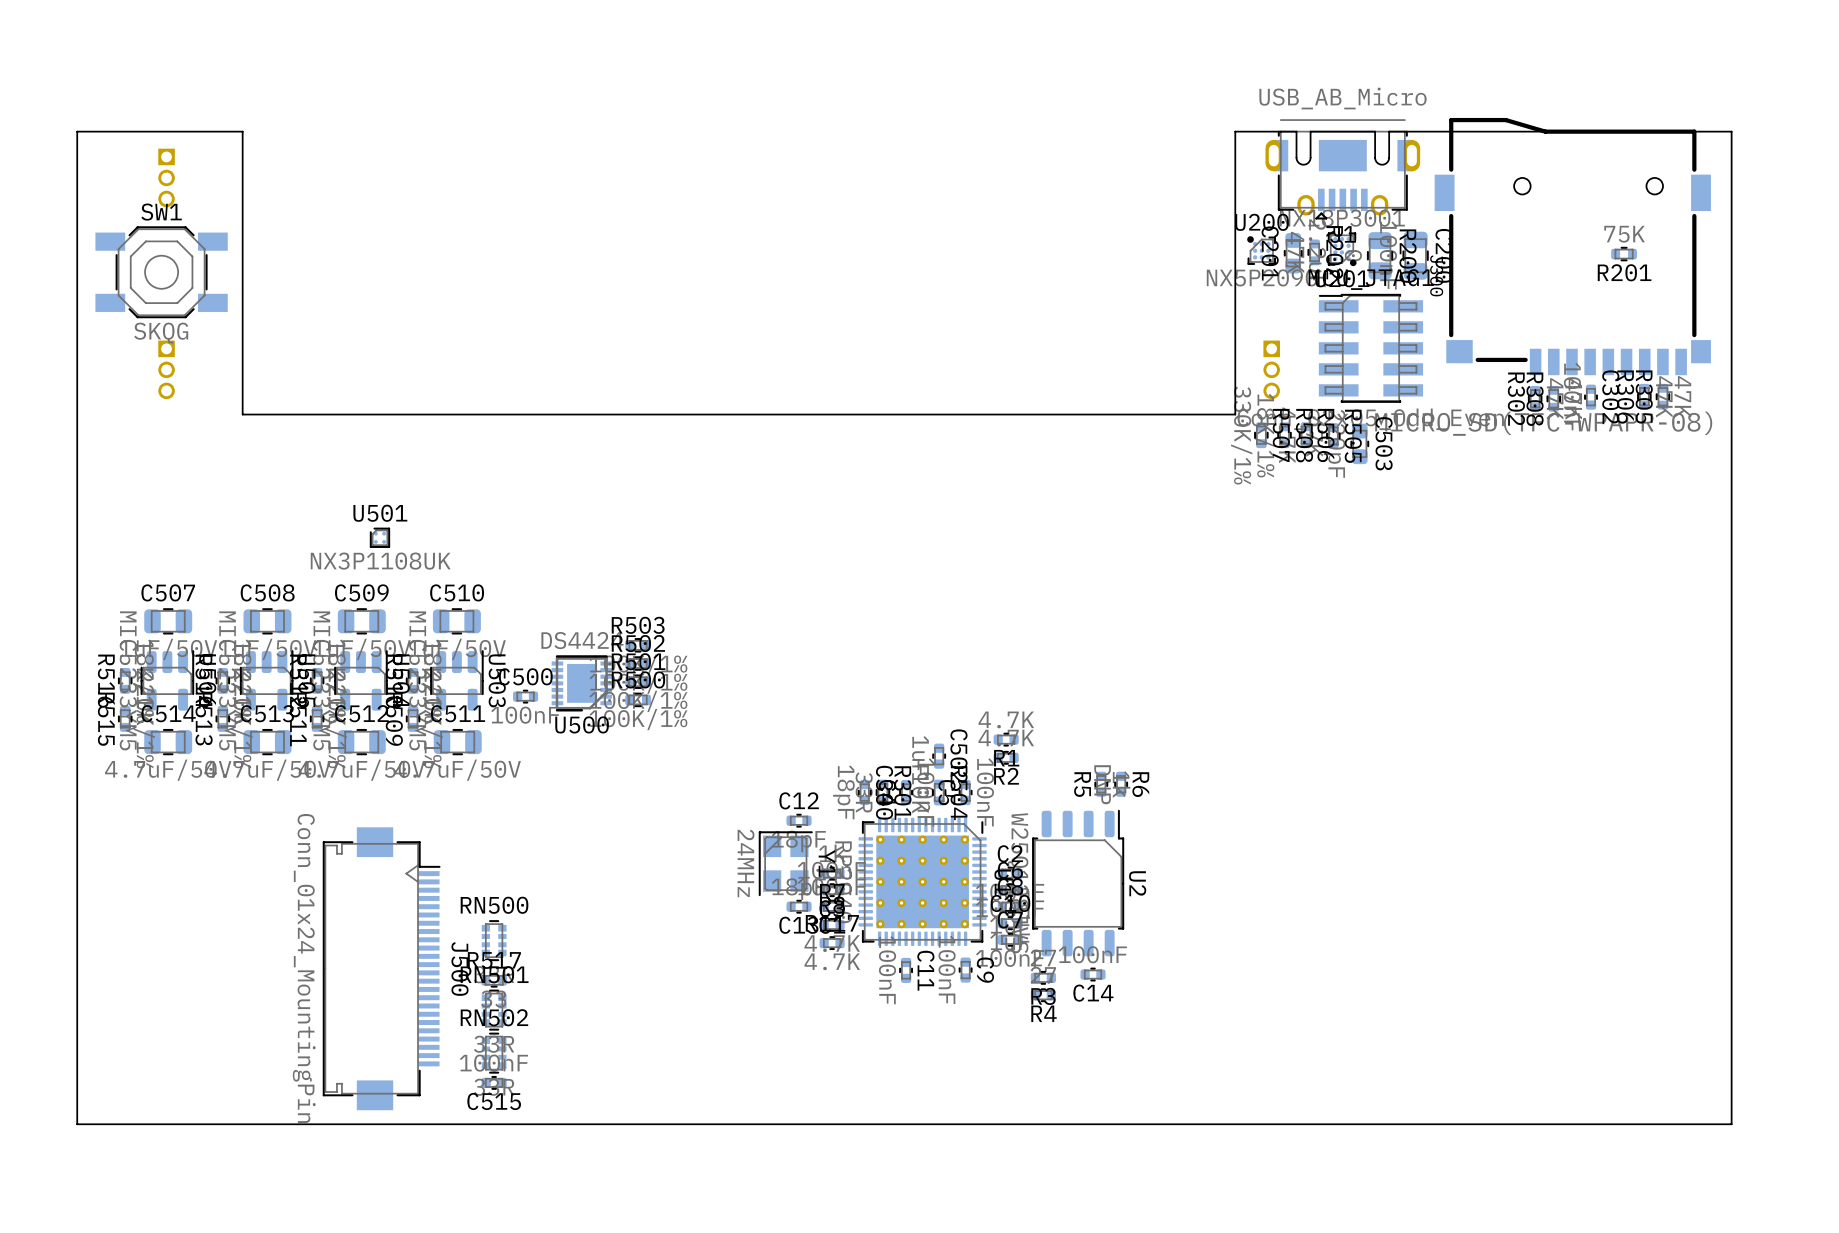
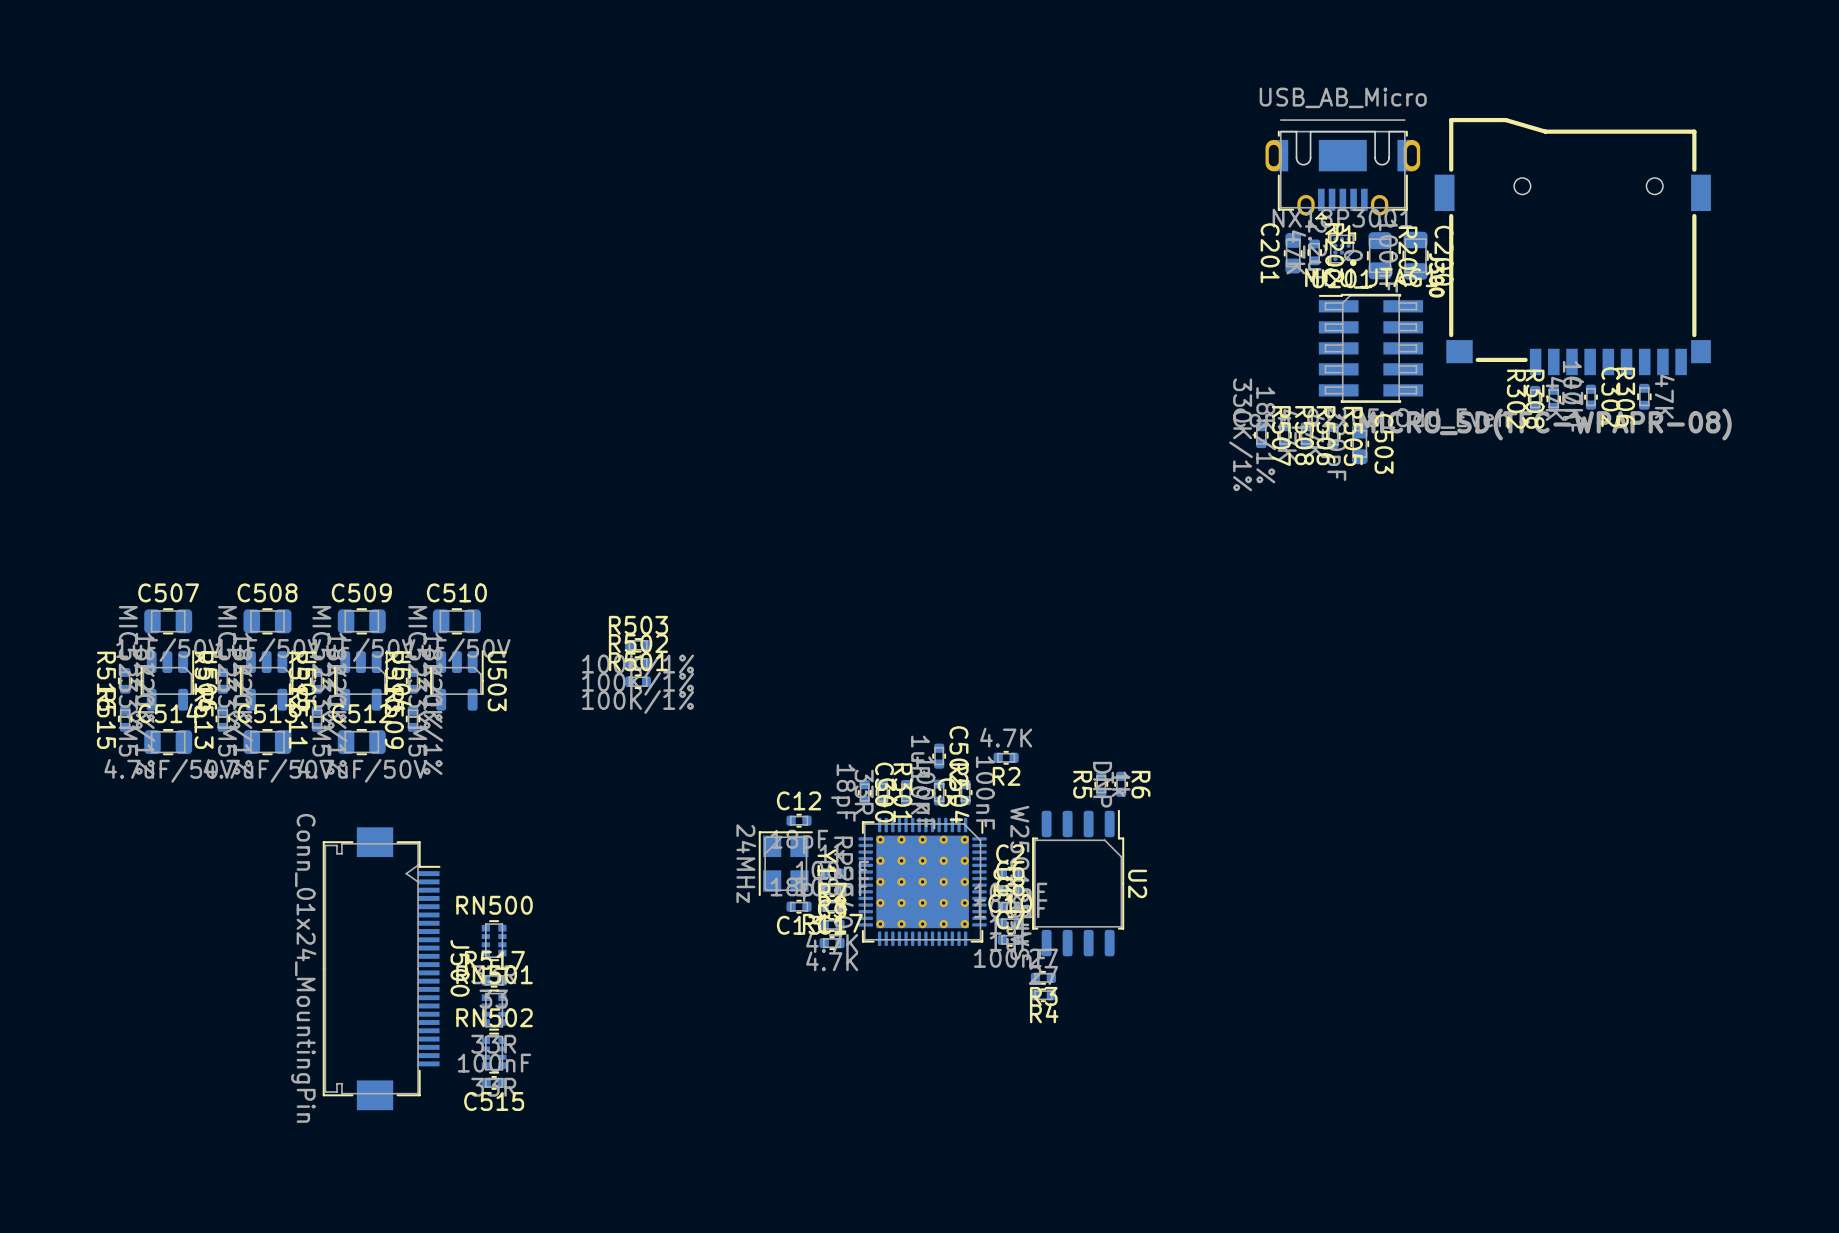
board edge: (1404, 131) (1731, 131) (1731, 1124) (77, 1124) (77, 131) (242, 131) (242, 414) (1235, 414) (1235, 131) (1280, 131) -> none
part: (166, 177) -> none
U200: NX5P2090 (1261, 250) -> none
R201: 75K (1624, 254) -> none
SW1: SKQG (161, 272) -> none
part: (166, 369) -> none
part: (1271, 369) -> none
R305: 47K (1662, 396) -> none
U501: NX3P1108UK (379, 537) -> none
U500: DS4424 (581, 683) -> none
C500: 100nF (525, 696) -> none
R500: 100K/1% (638, 699) -> none
R1: 4.7K (1006, 739) -> none
C511: 4.7uF/50V (457, 742) -> none
C11: 100nF (906, 970) -> none
C9: 100nF (965, 970) -> none
C14: 100nF (1093, 974) -> none

